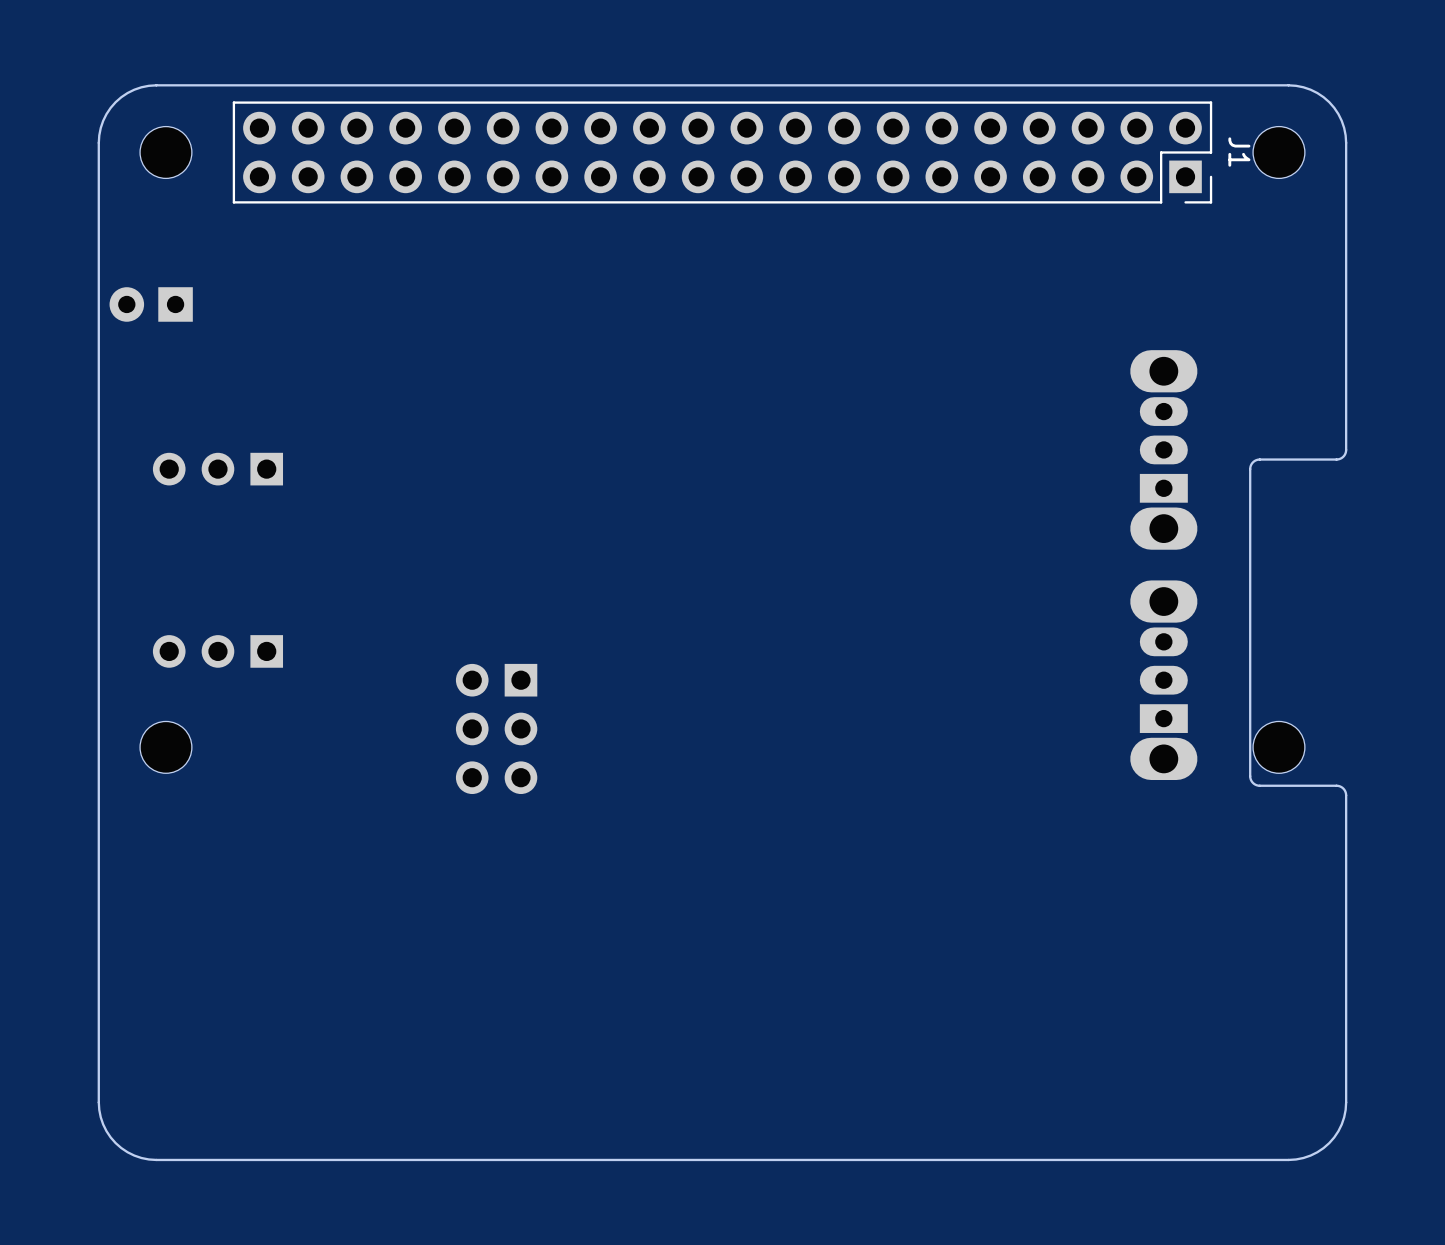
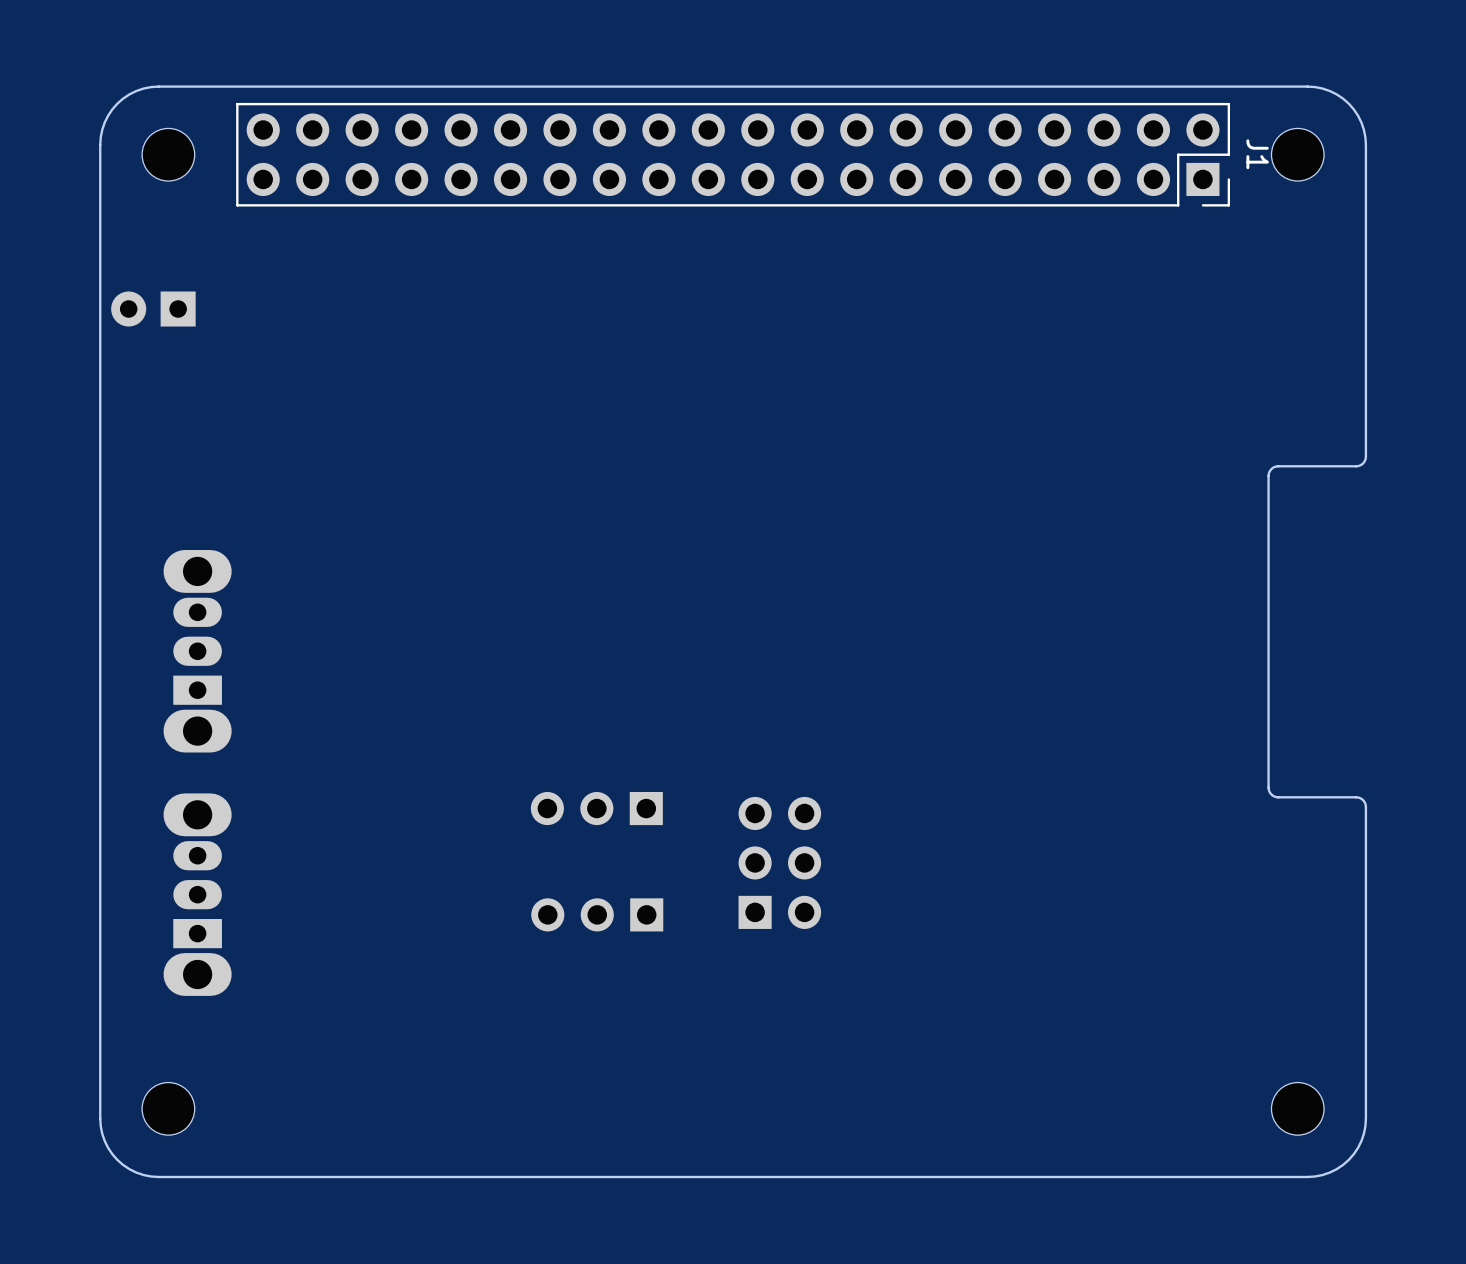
part: (1163, 449) -> none
part: (217, 469) -> none
part: none -> (197, 651)
part: (217, 651) -> none
part: (1163, 680) -> none
part rotation: 0° (496, 728) -> 180° (779, 862)
part position: (496, 728) -> (779, 862)
part position: (165, 747) -> (168, 1108)
part position: (1278, 747) -> (1297, 1108)
part: none -> (596, 808)
part: none -> (197, 894)
part: none -> (597, 914)

